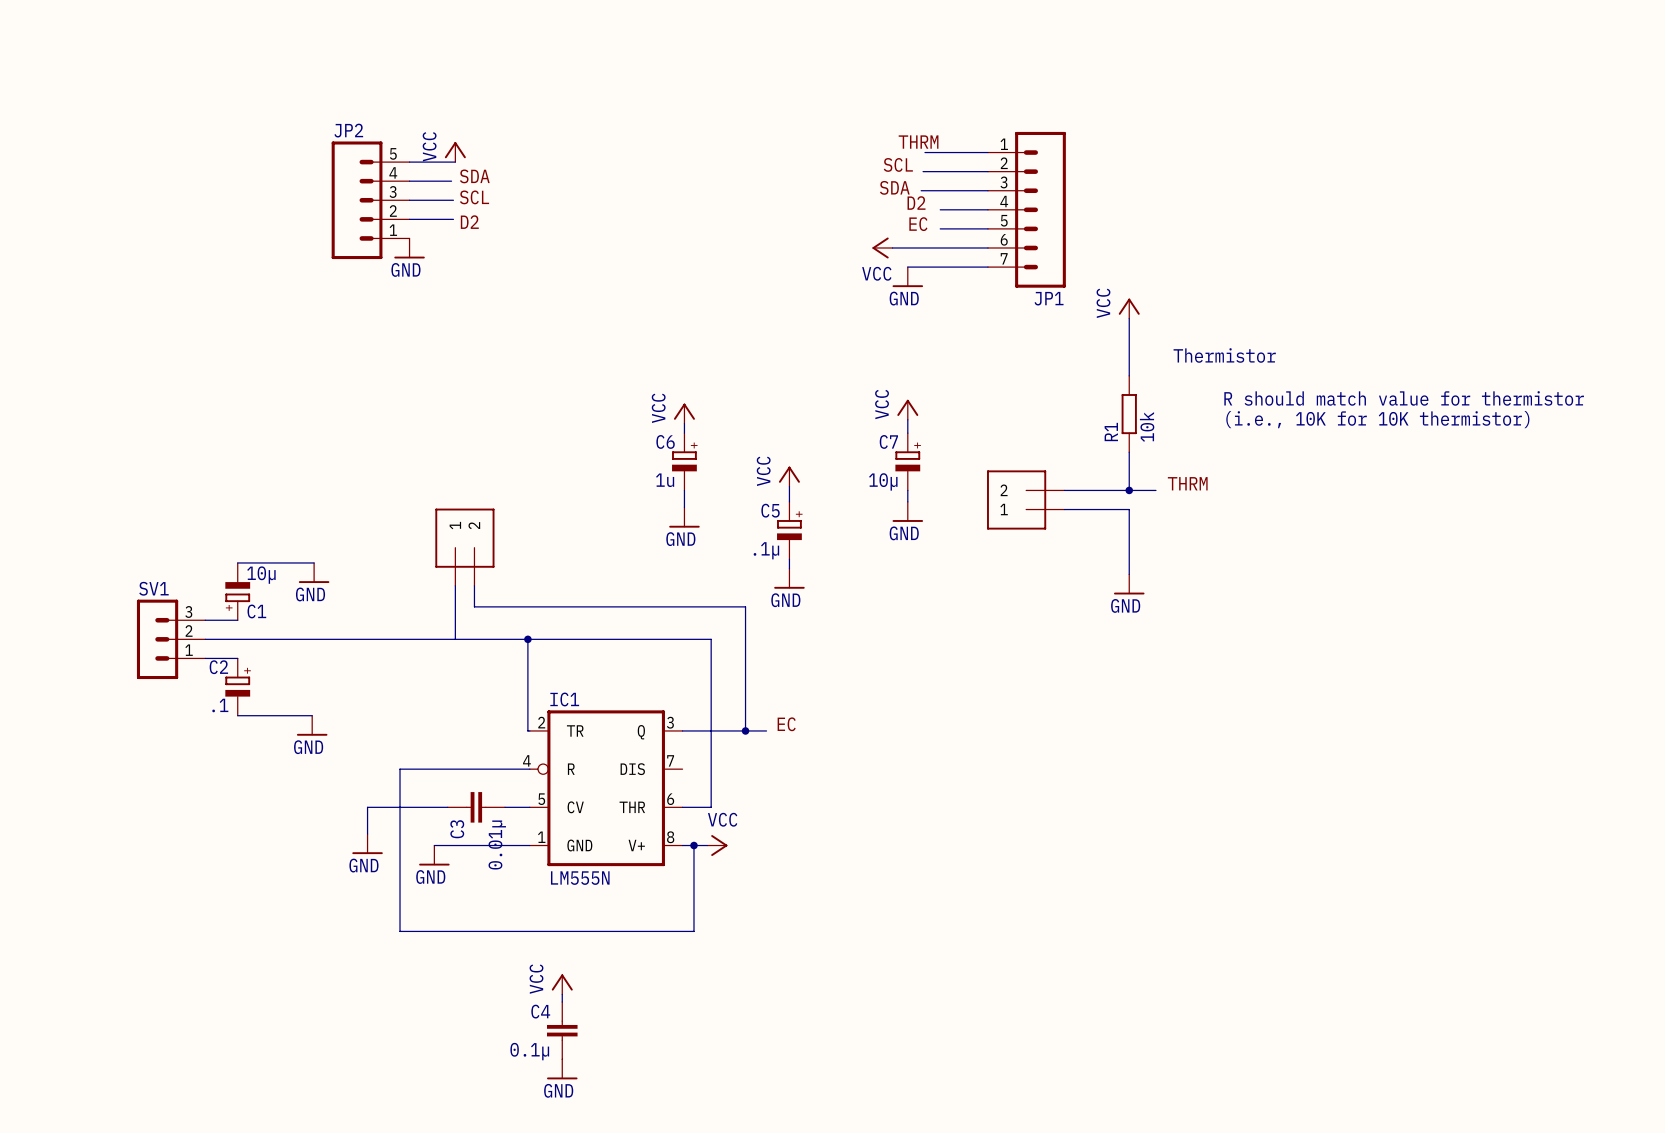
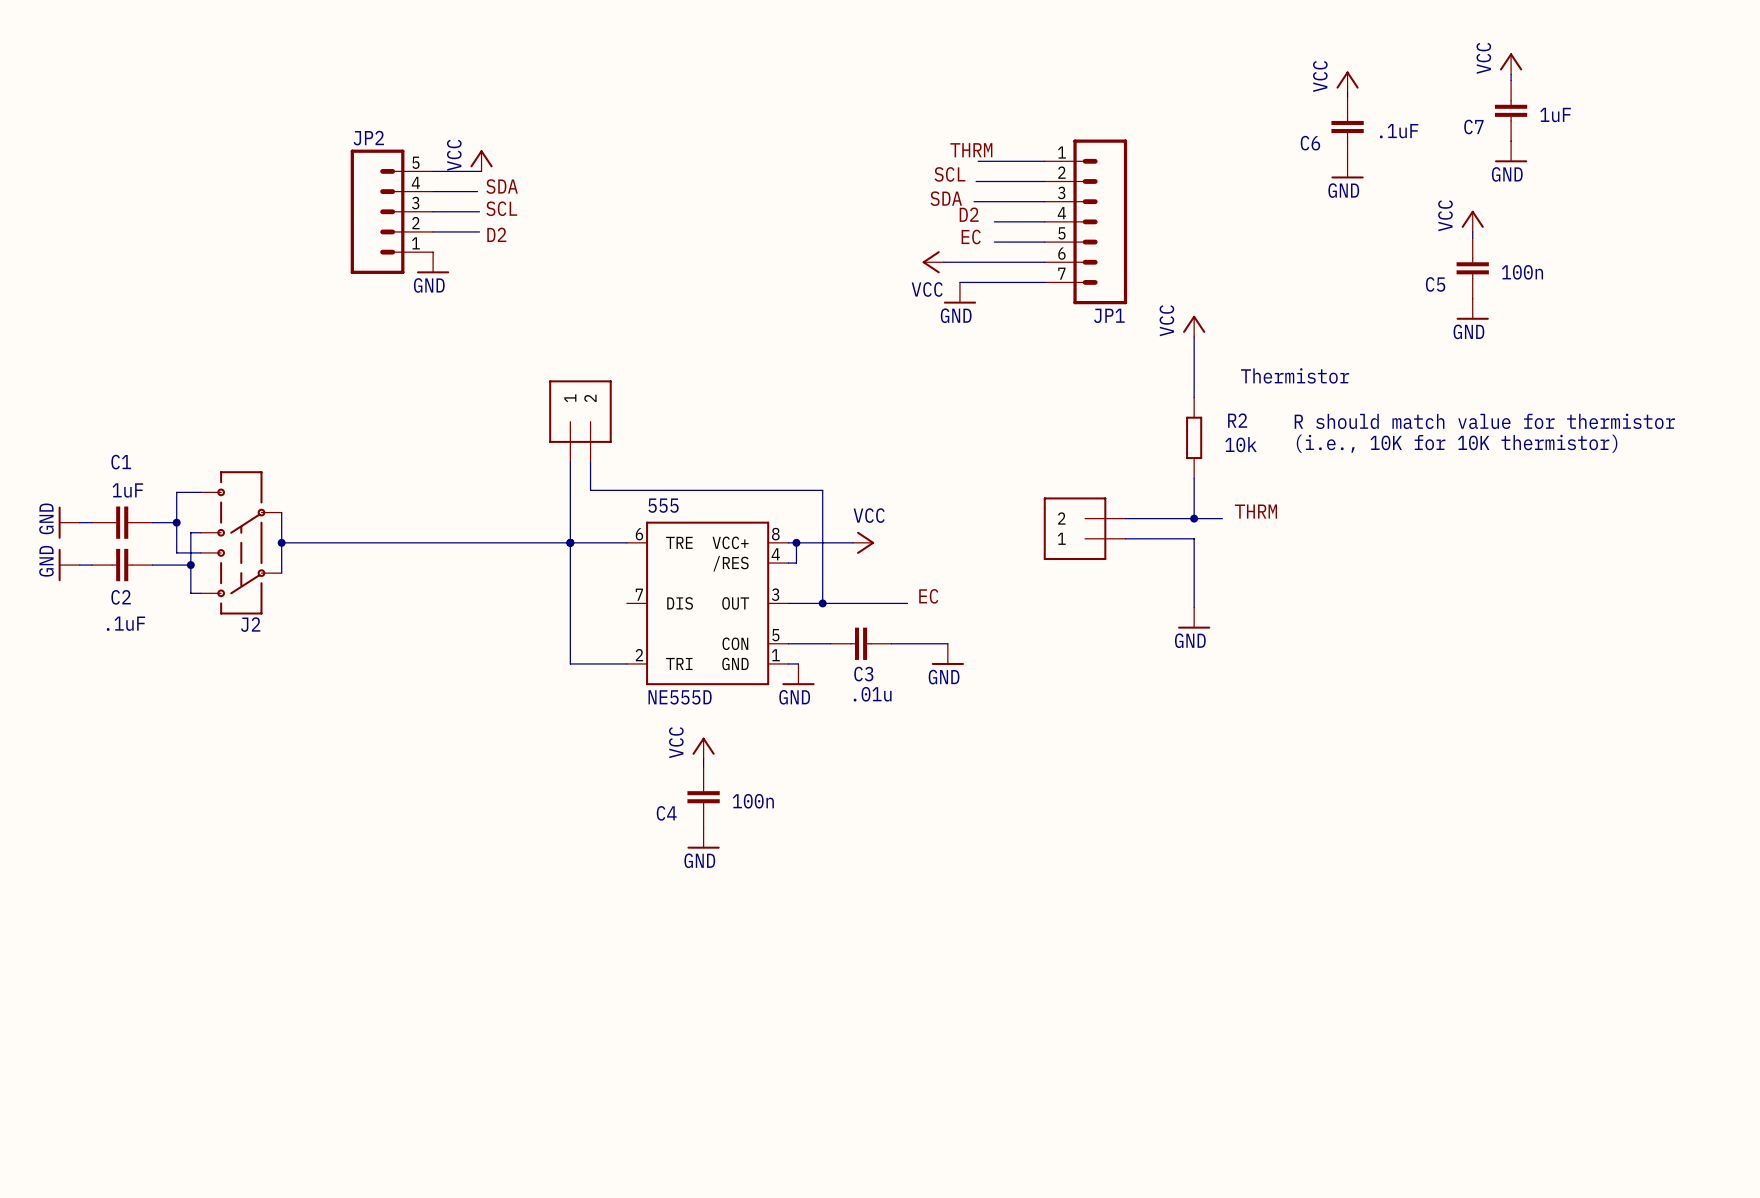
power symbol: none -> VCC (1511, 63)
wire: none -> (1511, 74) (1511, 80)
power symbol: none -> VCC (1347, 82)
wire: none -> (1347, 92) (1347, 96)
power symbol: none -> GND (1511, 151)
power symbol: none -> GND (1347, 167)
power symbol: none -> VCC (1472, 221)
wire: none -> (1472, 231) (1472, 238)
power symbol: none -> GND (1472, 309)
power symbol: VCC (907, 409) -> none
power symbol: VCC (684, 413) -> none
wire: (907, 419) (907, 433) -> none
wire: (684, 423) (684, 433) -> none
R1 value rotation: 0° (1147, 426) -> 90° clockwise (1241, 444)
R1 name: R1 (1111, 432) -> R2 (1237, 420)
C6 symbol: [672, 433, 697, 491] -> [1331, 96, 1364, 158]
C7 symbol: [895, 433, 921, 491] -> [1494, 80, 1528, 142]
wire: none -> (570, 462) (570, 663) (626, 663)
wire: none -> (590, 462) (590, 490) (822, 490) (822, 603)
C6 name position: C6 (665, 441) -> C6 (1310, 143)
C7 name position: C7 (888, 441) -> C7 (1473, 126)
wire: none -> (200, 492) (176, 492) (176, 552) (200, 552)
power symbol rotation: 0° (789, 474) -> 90° clockwise (865, 542)
power symbol position: VCC (789, 476) -> VCC (863, 542)
C6 value: 1u (665, 480) -> .1uF (1399, 131)
C7 value: 10µ (883, 481) -> 1uF (1555, 115)
wire: none -> (281, 512) (281, 573)
wire: (789, 486) (789, 501) -> none
wire: (684, 490) (684, 507) -> none
wire: (907, 490) (907, 501) -> none
power symbol: none -> GND (69, 522)
wire: none -> (79, 522) (91, 522)
wire: none -> (152, 522) (176, 522)
junction: none -> (176, 522)
C5 symbol: [777, 501, 802, 560] -> [1456, 238, 1489, 299]
wire: none -> (200, 532) (190, 532) (190, 593) (200, 593)
C5 name position: C5 (770, 510) -> C5 (1435, 284)
power symbol: GND (907, 511) -> none
J2: none -> (241, 542)
wire: none -> (281, 542) (626, 542)
junction: none -> (281, 542)
junction: none -> (570, 542)
wire: none -> (788, 542) (852, 542)
wire: none -> (796, 542) (796, 563) (788, 563)
junction: none -> (796, 542)
power symbol: GND (684, 517) -> none
power symbol: none -> GND (69, 565)
wire: none -> (79, 565) (91, 565)
wire: none -> (152, 565) (190, 565)
junction: none -> (190, 565)
part position: (464, 547) -> (580, 421)
C5 value: .1µ (766, 550) -> 100n (1522, 272)
wire: (789, 559) (789, 568) -> none
C1 symbol: [225, 562, 251, 621] -> [91, 506, 153, 539]
wire: (237, 562) (314, 562) -> none
555: none -> NE555D (707, 603)
wire: none -> (788, 603) (907, 603)
junction: none -> (822, 603)
power symbol: GND (314, 573) -> none
C1 value: 10µ (261, 575) -> 1uF (127, 490)
power symbol: GND (789, 578) -> none
wire: (455, 585) (455, 639) -> none
wire: (474, 585) (474, 606) (745, 606) (745, 730) -> none
wire: none -> (788, 643) (830, 643)
wire: none -> (891, 643) (947, 643)
C1 name position: C1 (256, 611) -> C1 (121, 462)
power symbol: none -> GND (947, 654)
wire: (205, 620) (237, 620) -> none
wire: none -> (788, 663) (798, 663)
power symbol: none -> GND (798, 674)
SV1: (171, 639) -> none
wire: (205, 639) (711, 639) (711, 807) (682, 807) -> none
wire: (527, 639) (527, 730) (529, 730) -> none
junction: (527, 639) -> none
wire: (205, 658) (237, 658) -> none
C2 symbol: [225, 658, 251, 716] -> [91, 548, 153, 582]
C2 name position: C2 (218, 667) -> C2 (121, 597)
C2 value: .1 (220, 705) -> .1uF (125, 623)
power symbol: none -> VCC (703, 748)
wire: (237, 715) (312, 715) -> none
wire: none -> (703, 758) (703, 766)
label position: EC (786, 724) -> EC (928, 596)
power symbol: GND (312, 725) -> none
wire: (682, 730) (766, 730) -> none
junction: (745, 730) -> none
wire: (529, 769) (400, 769) (400, 931) (693, 931) (693, 845) -> none
IC1: LM555N (606, 788) -> none
power symbol: none -> GND (703, 838)
wire: (447, 807) (367, 807) (367, 834) -> none
C3 position: (476, 807) -> (861, 643)
wire: (505, 807) (529, 807) -> none
C3 name rotation: 0° (457, 829) -> 90° clockwise (863, 674)
power symbol: GND (367, 844) -> none
wire: (434, 845) (529, 845) -> none
C3 value: 0.01µ (497, 845) -> .01u (872, 694)
wire: (682, 845) (707, 845) -> none
junction: (693, 845) -> none
power symbol: VCC (717, 845) -> none
power symbol: GND (434, 855) -> none
power symbol: VCC (562, 984) -> none
wire: (562, 994) (562, 1002) -> none
C4 name position: C4 (540, 1011) -> C4 (666, 813)
C4 position: (562, 1030) -> (703, 797)
C4 value: 0.1µ (529, 1051) -> 100n (753, 801)
power symbol: GND (562, 1069) -> none

